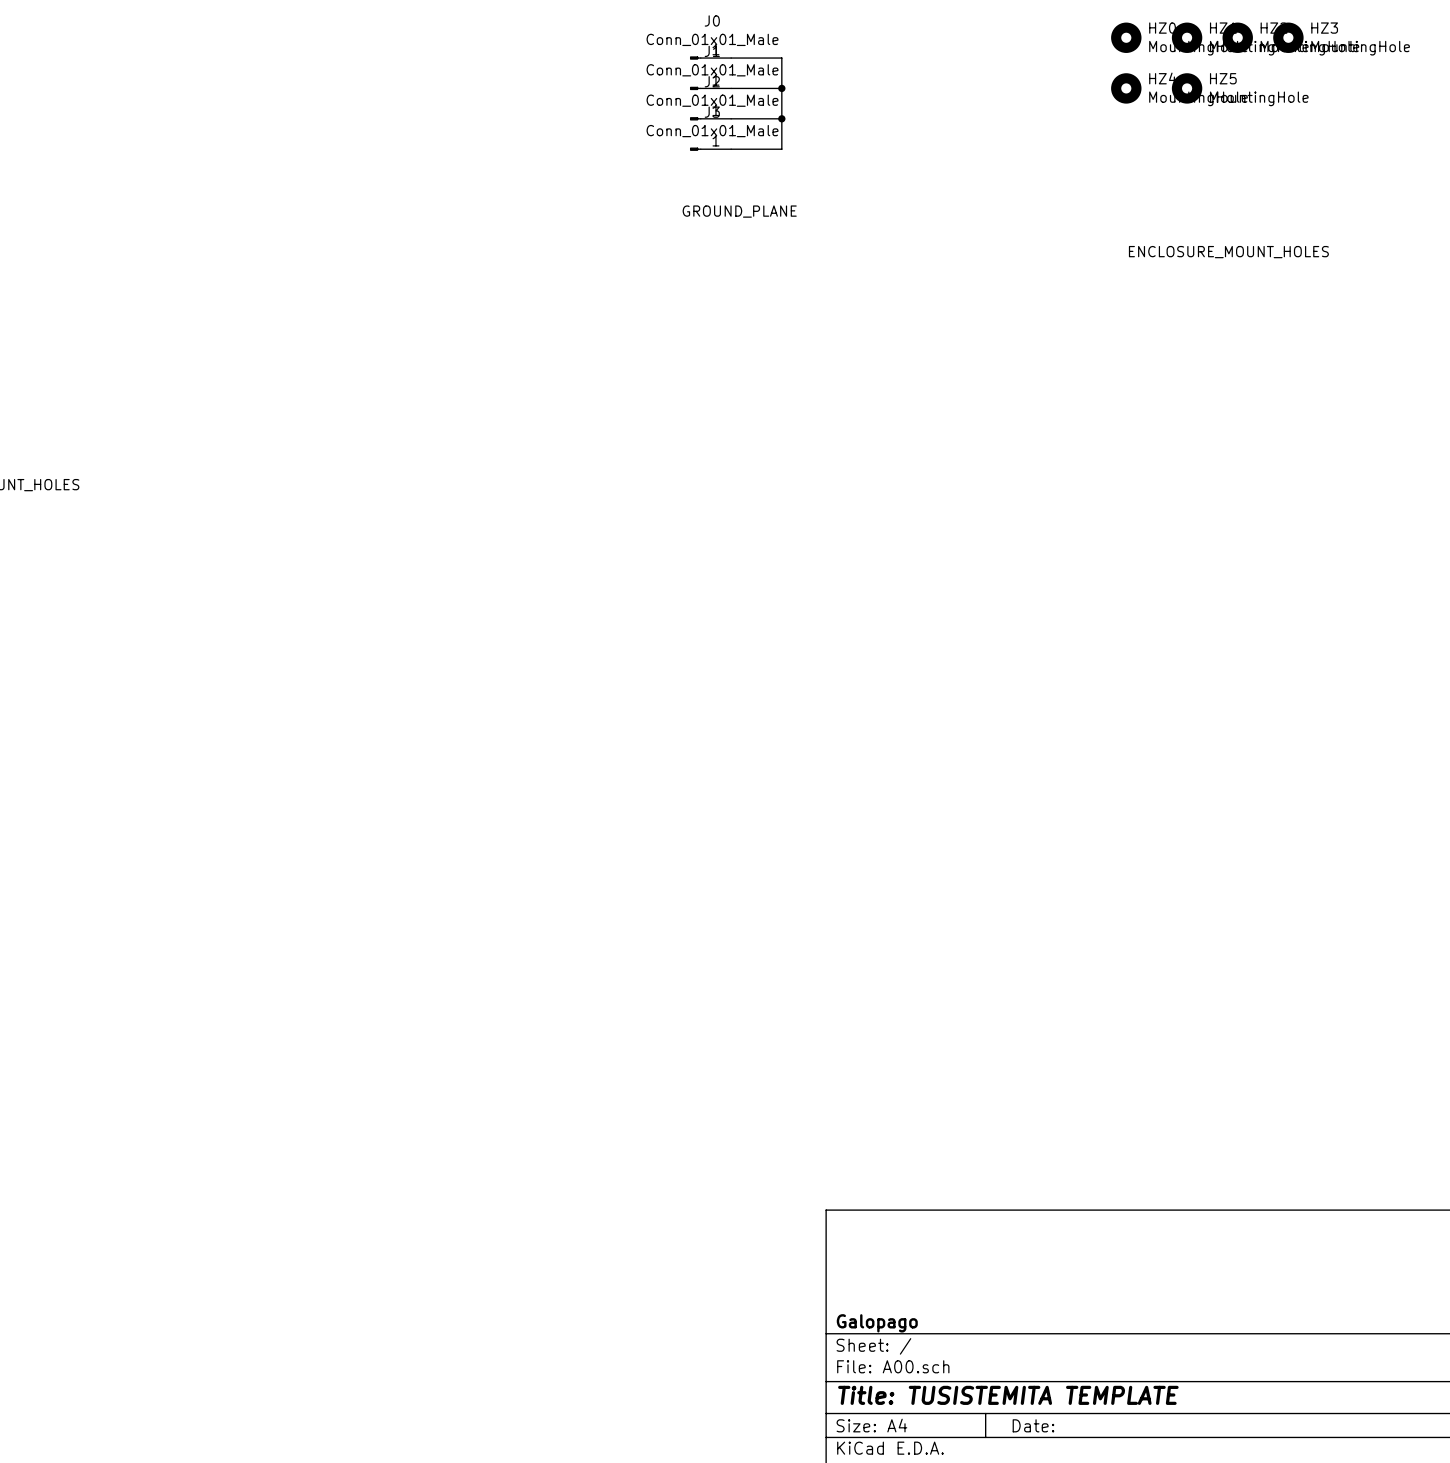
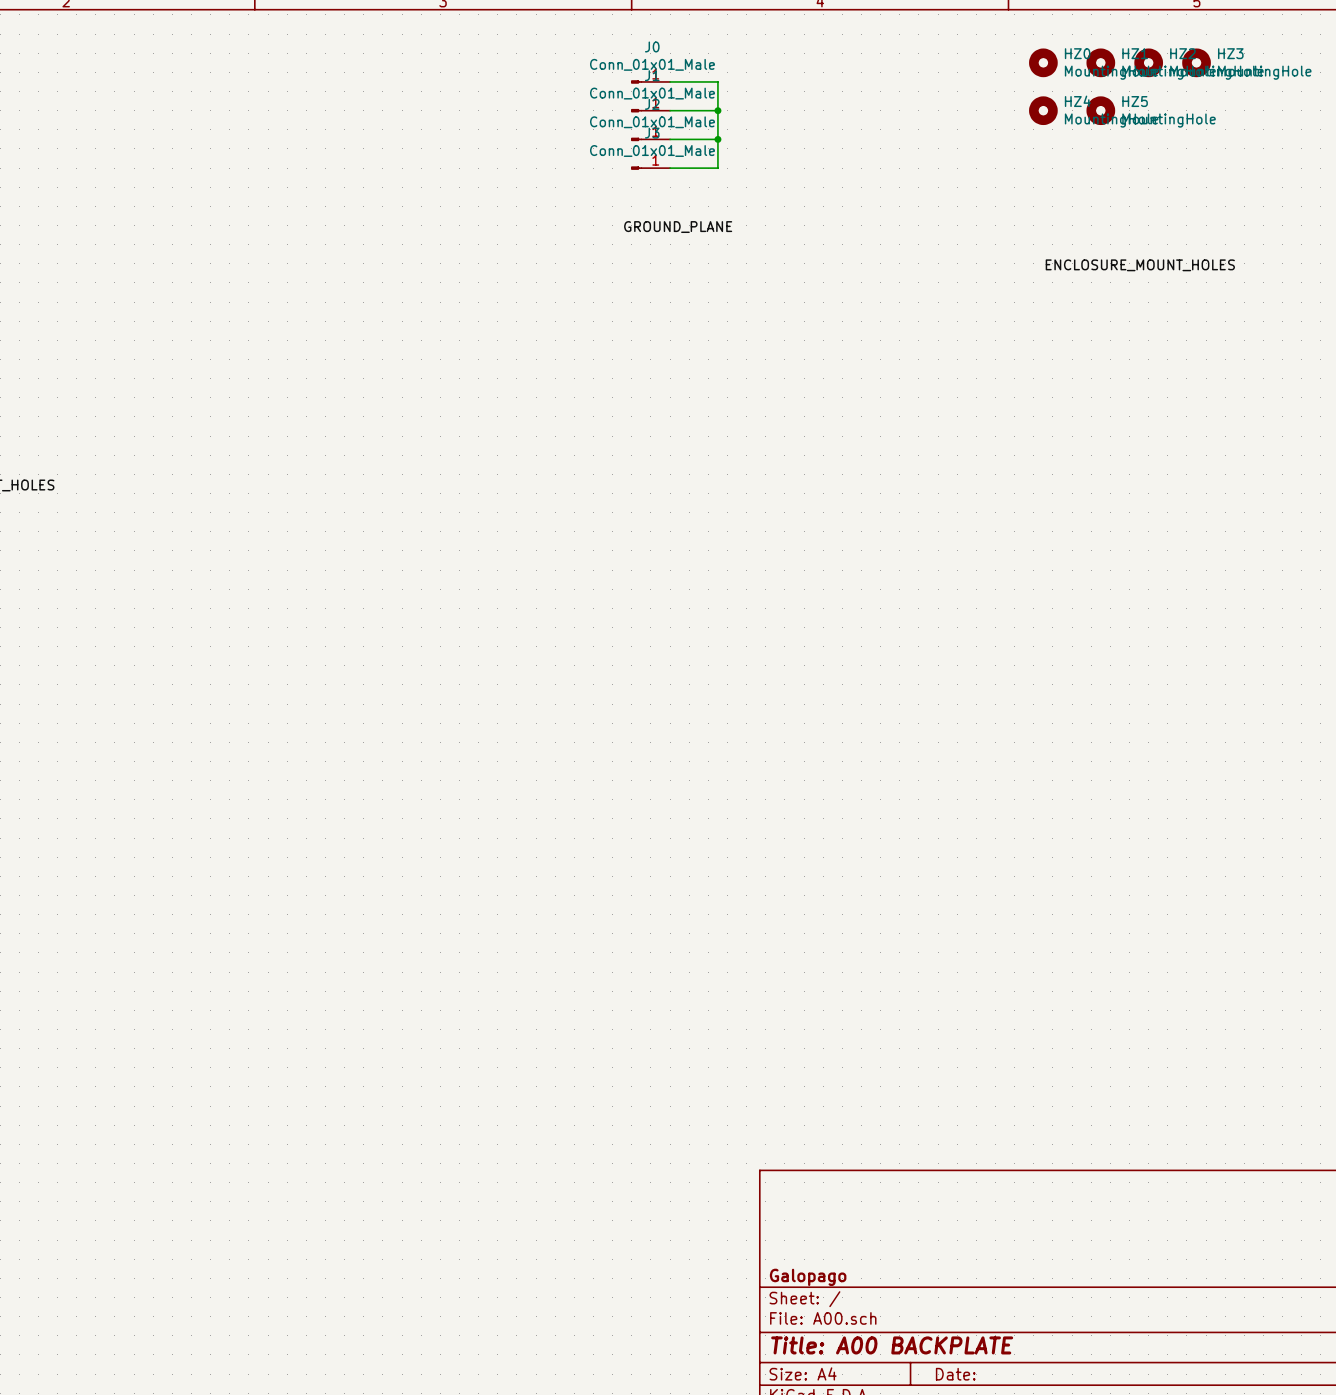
title block: Title: TUSISTEMITA TEMPLATE (1008, 1395) -> Title: A00 BACKPLATE (892, 1345)

